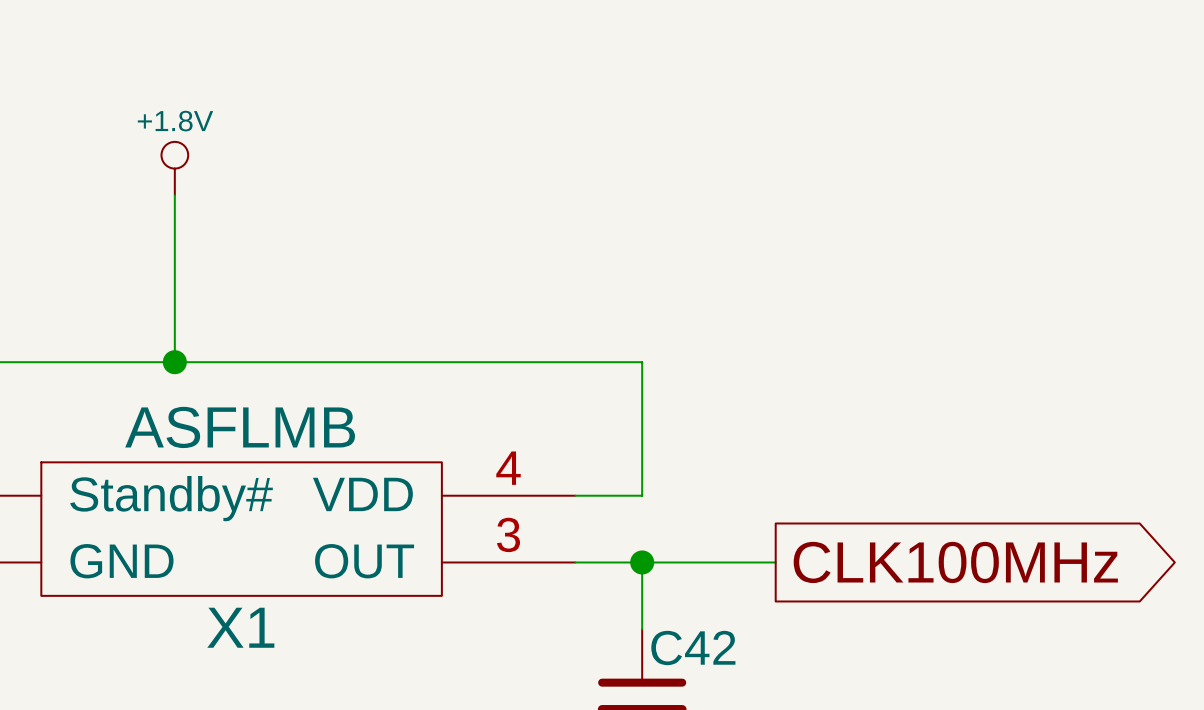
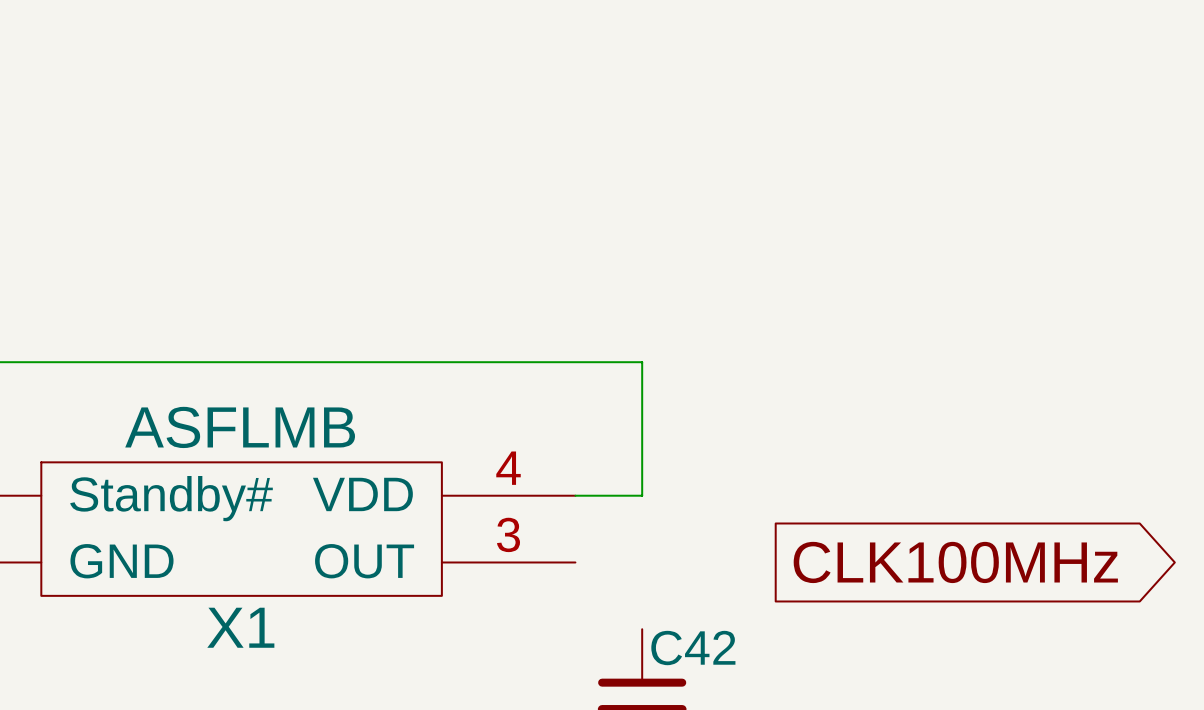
power symbol: +1.8V (174, 168) -> none
wire: (174, 195) (174, 362) -> none
junction: (174, 362) -> none
wire: (575, 562) (775, 562) -> none
wire: (642, 562) (642, 629) -> none
junction: (642, 562) -> none

